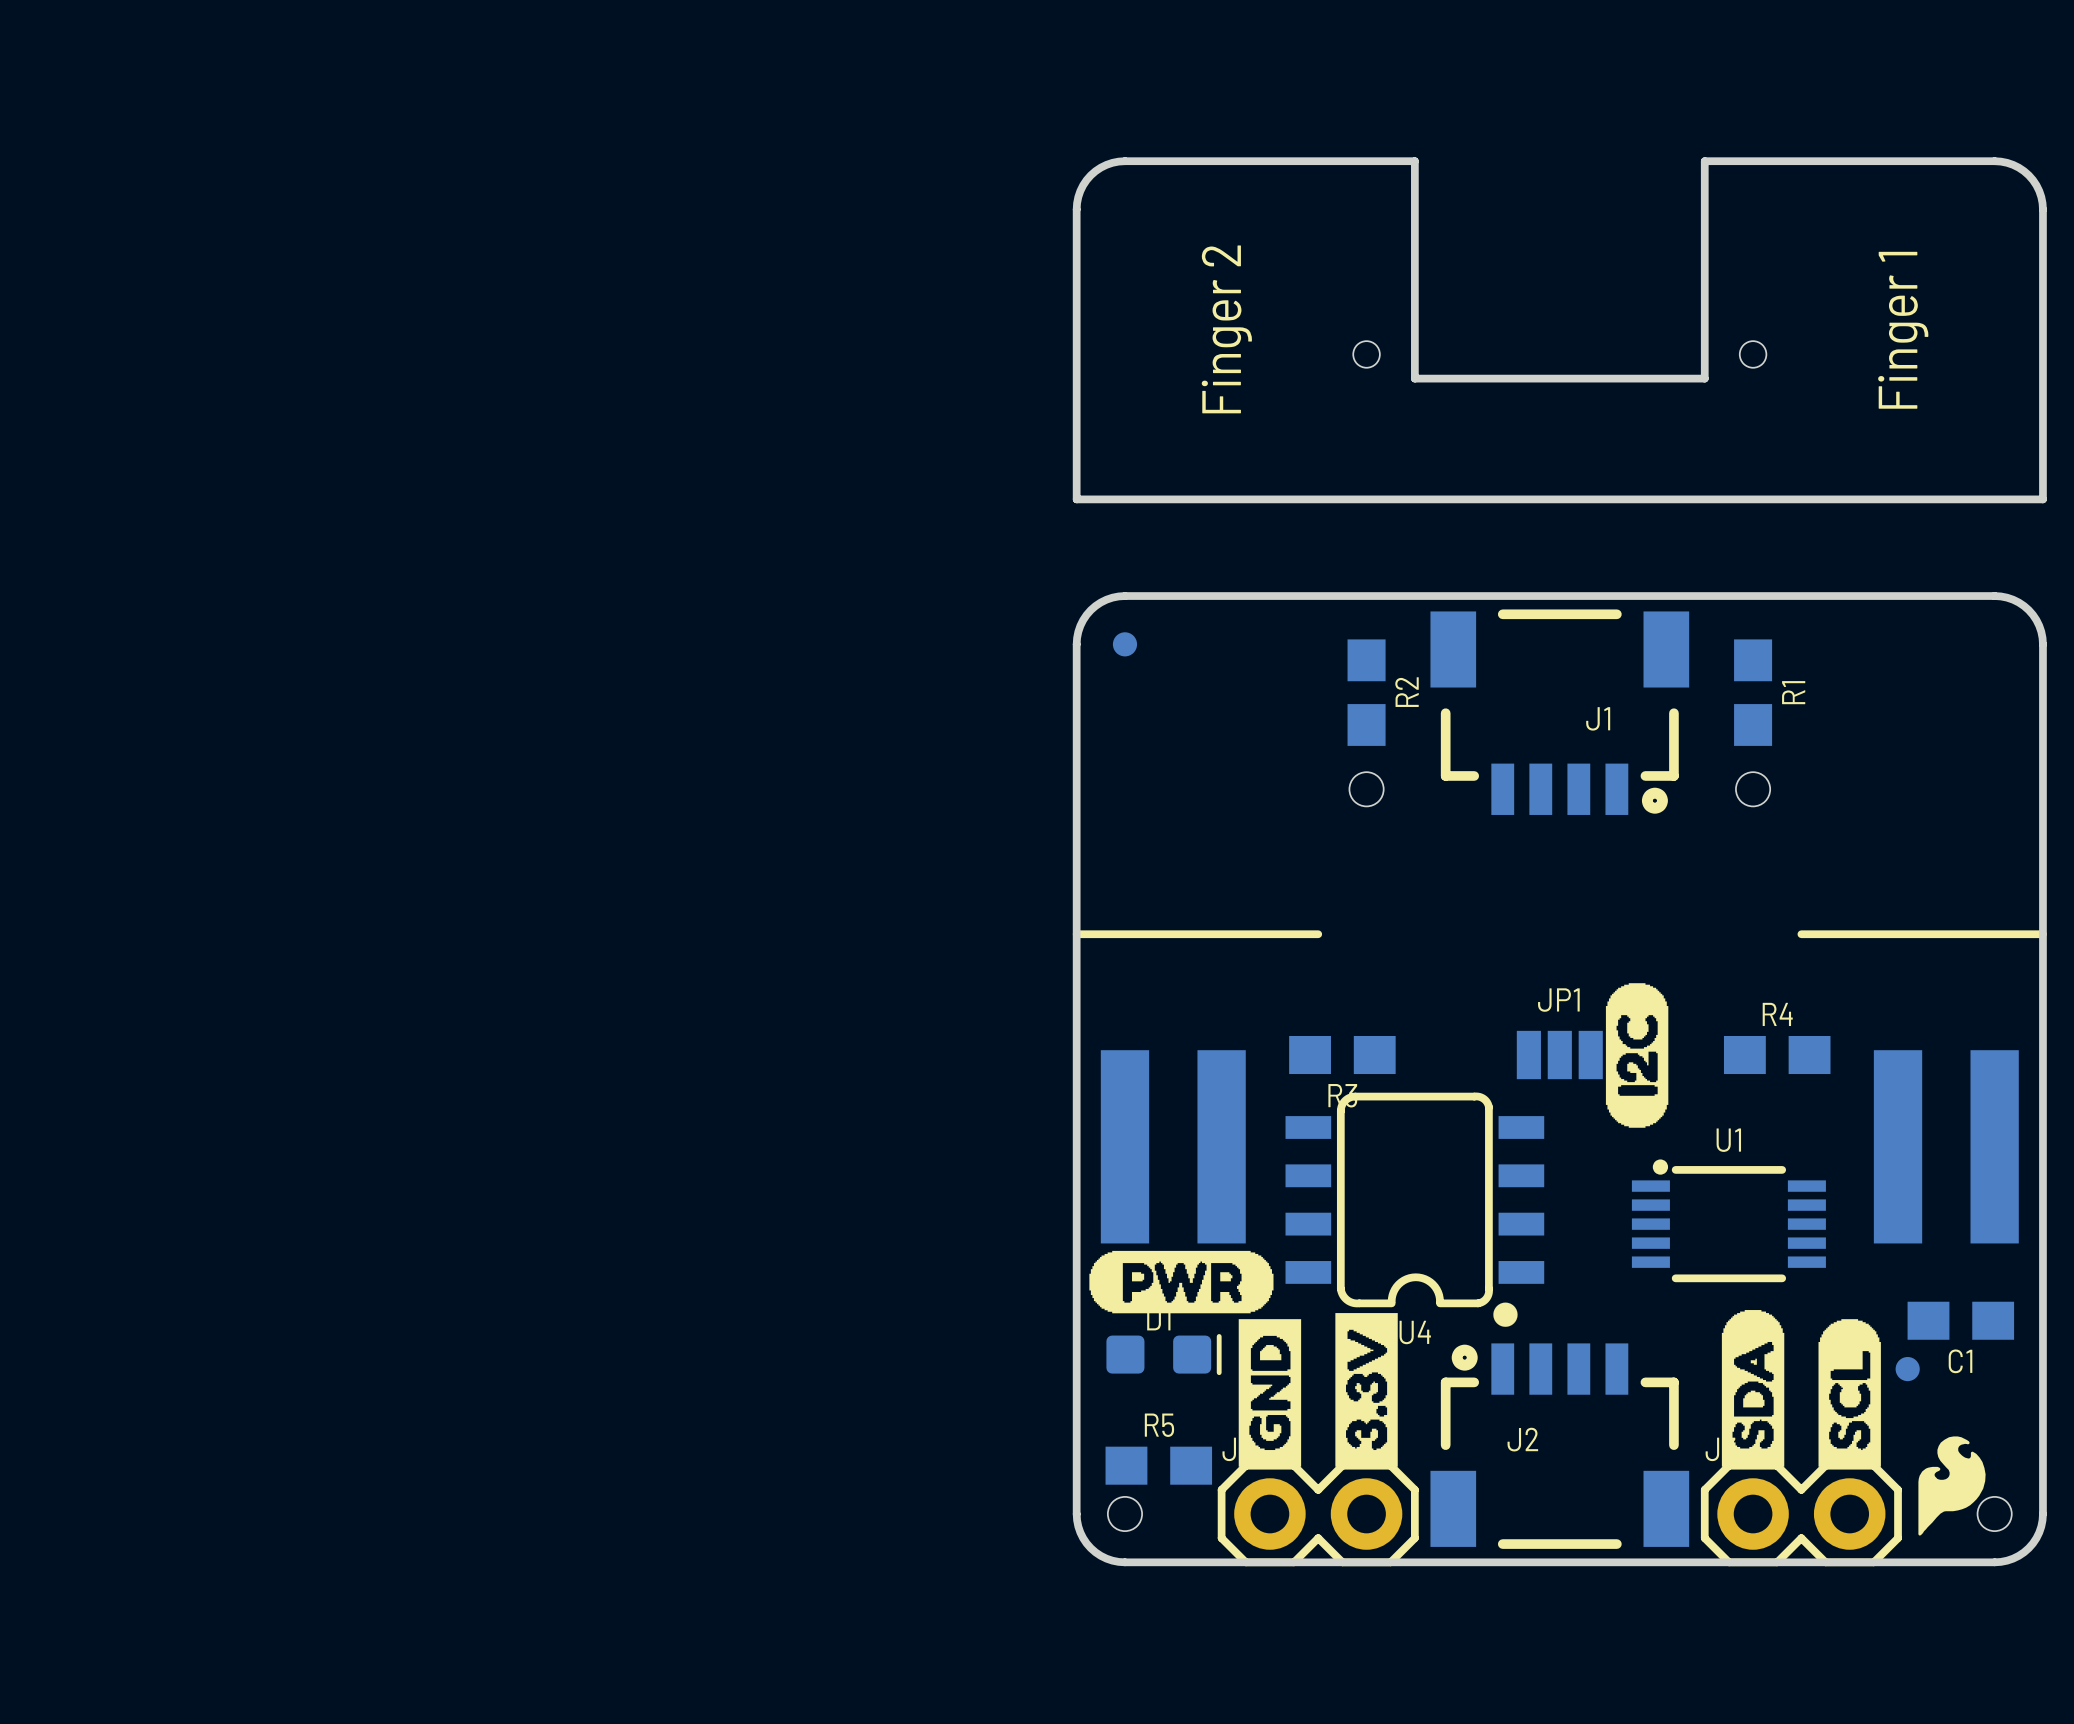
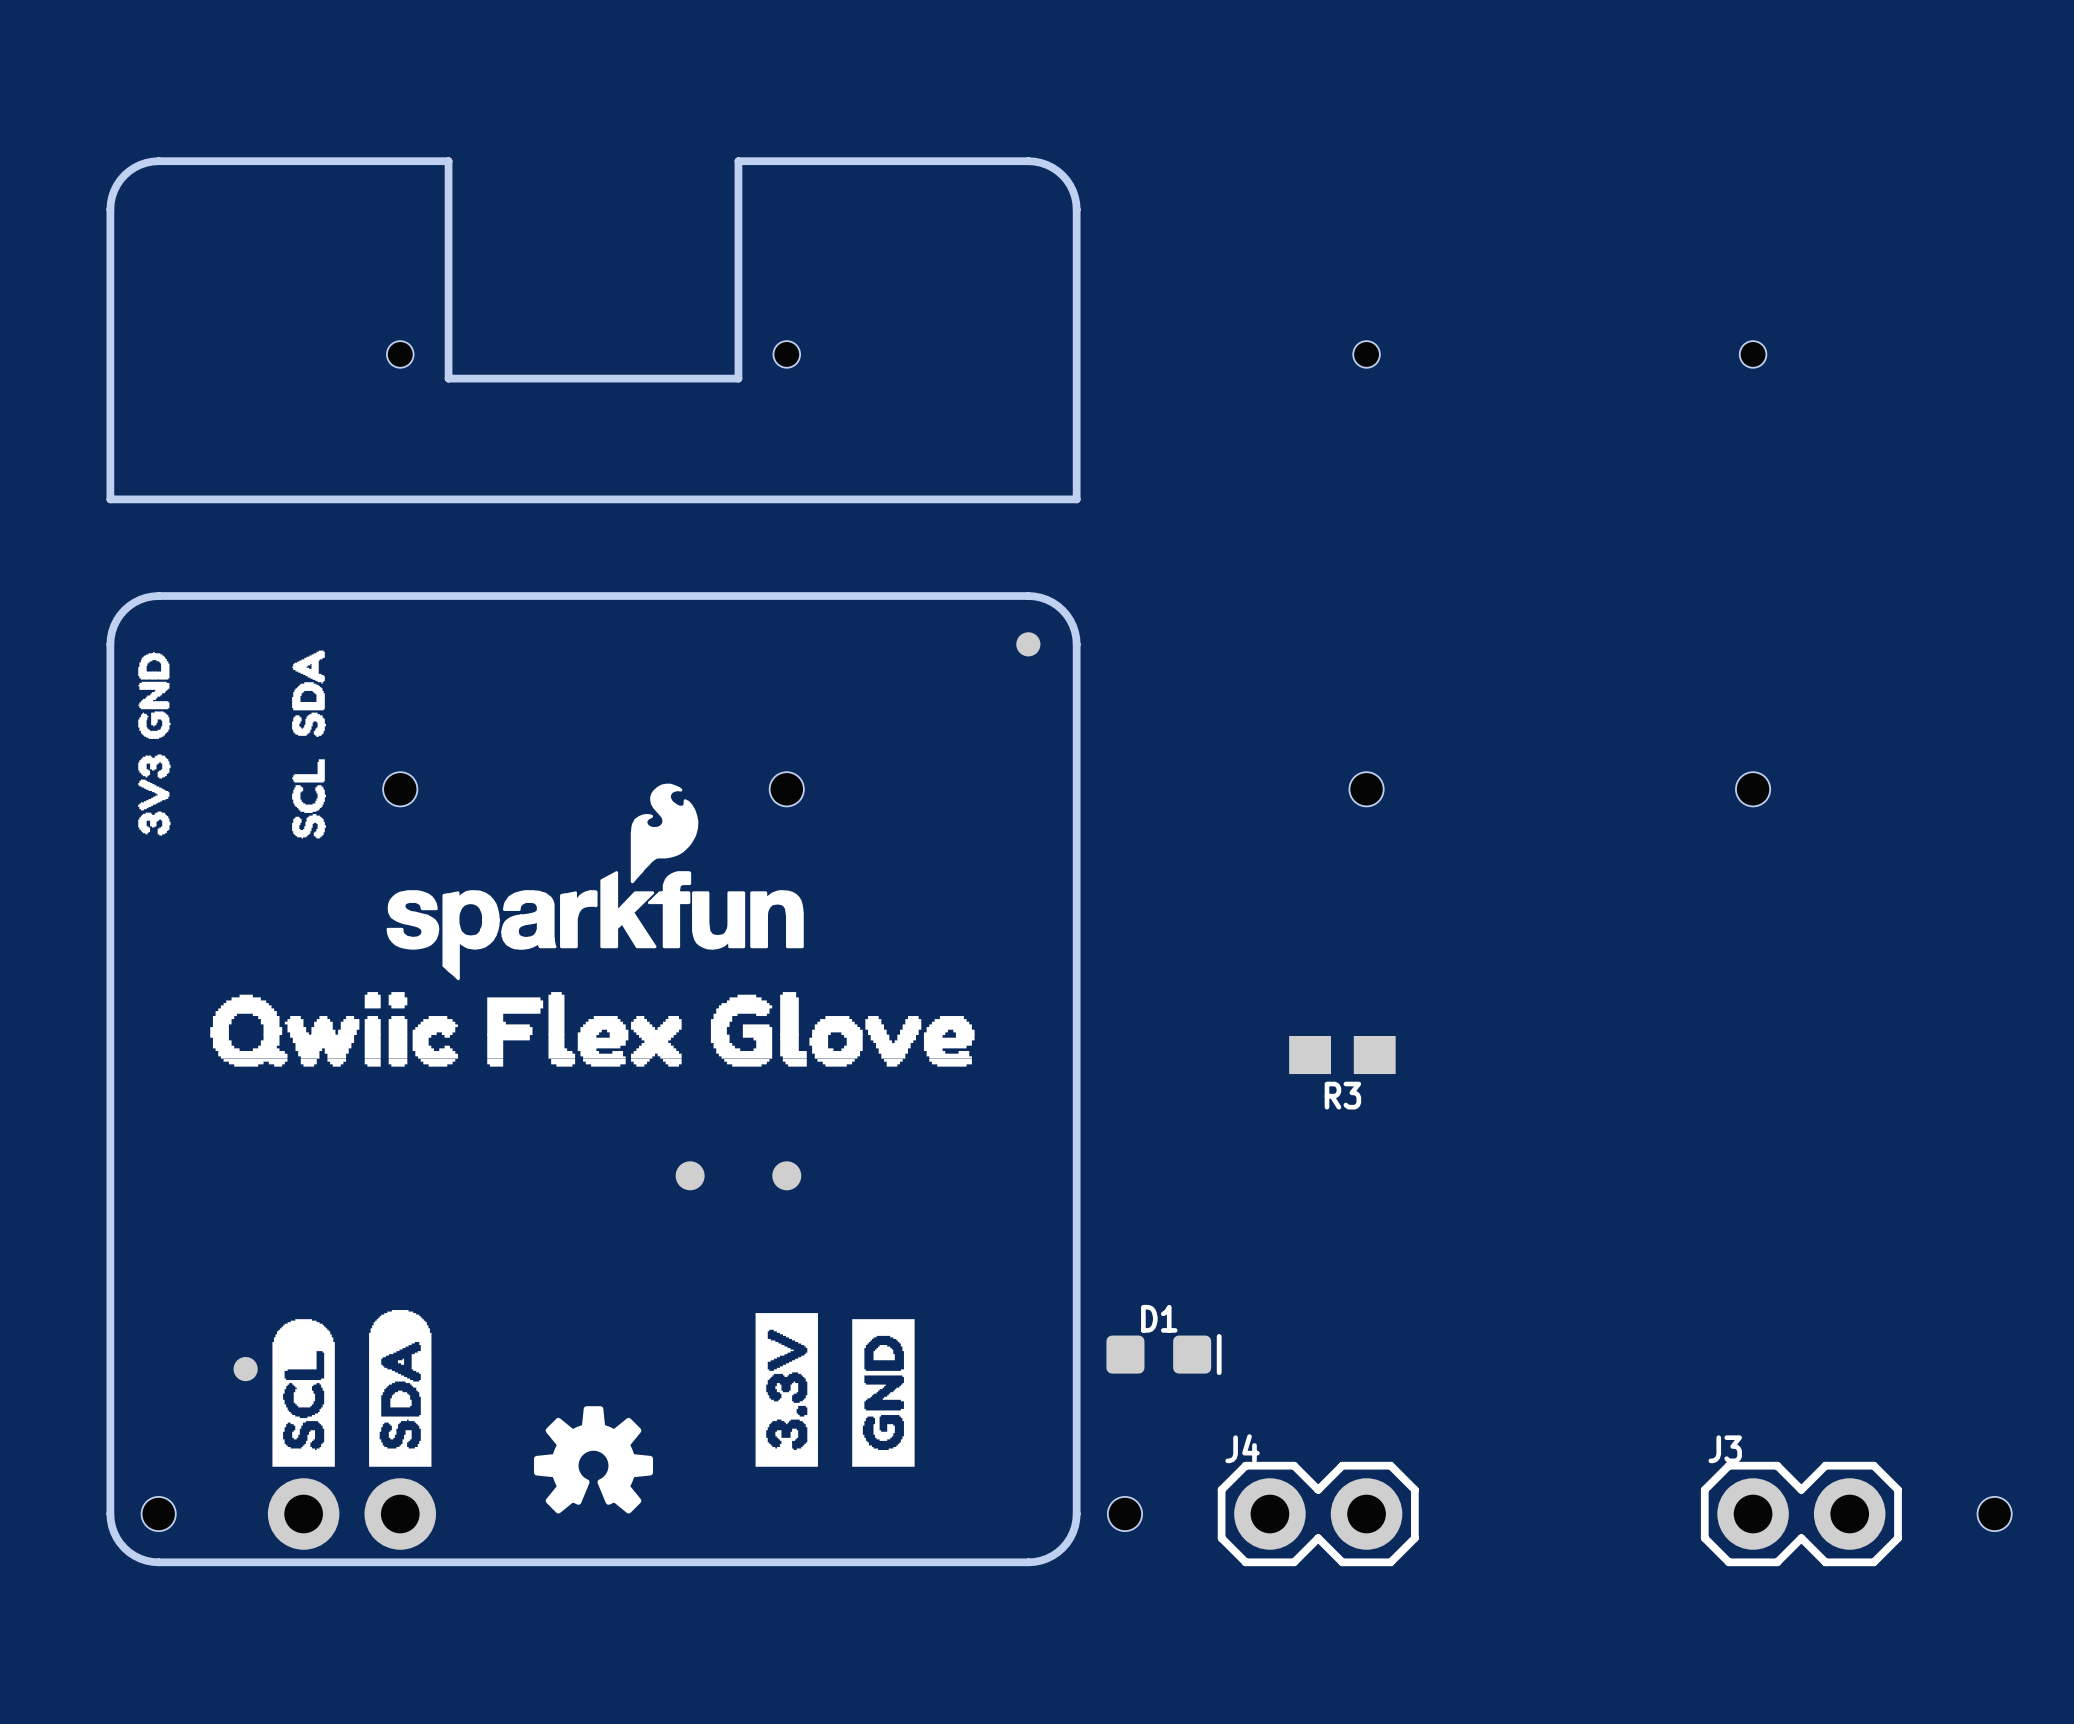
board edge: (1076, 209) (1078, 197) (1086, 180) (1100, 167) (1118, 161) (1414, 161) (1414, 378) (1704, 378) (1704, 161) (2000, 161) (2018, 167) (2032, 180) (2041, 197) (2042, 209) (2042, 499) (1076, 499) -> (1076, 209) (1075, 197) (1066, 180) (1052, 167) (1034, 161) (738, 161) (738, 378) (448, 378) (448, 161) (152, 161) (134, 167) (120, 180) (112, 197) (110, 209) (110, 499) (1076, 499)
text: Finger 2 (1226, 329) -> none
text: Finger 1 (1903, 330) -> none
hole: none -> (400, 354)
hole: none -> (786, 354)
board edge: (1076, 644) (1080, 625) (1090, 610) (1106, 599) (1124, 596) (1994, 596) (2013, 599) (2028, 610) (2039, 625) (2042, 644) (2042, 1514) (2039, 1532) (2028, 1548) (2013, 1558) (1994, 1562) (1124, 1562) (1106, 1558) (1090, 1548) (1080, 1532) (1076, 1514) -> (1076, 644) (1072, 625) (1062, 610) (1046, 599) (1028, 596) (158, 596) (140, 599) (124, 610) (114, 625) (110, 644) (110, 1514) (114, 1532) (124, 1548) (140, 1558) (158, 1562) (1028, 1562) (1046, 1558) (1062, 1548) (1072, 1532) (1076, 1514)
part position: (1124, 644) -> (1028, 644)
drawing: none -> [292, 650, 326, 839]
drawing: none -> [138, 652, 171, 836]
R2: (1366, 692) -> none
R1: (1753, 692) -> none
J1: (1559, 712) -> none
drawing: none -> [210, 783, 975, 1067]
hole: none -> (400, 789)
hole: none -> (786, 789)
line: (1318, 934) (1076, 934) -> none
line: (2042, 934) (1801, 934) -> none
drawing: [1605, 983, 1669, 1128] -> none
JP1: (1559, 1055) -> none
R4: (1777, 1055) -> none
part: (1173, 1146) -> none
part: (1946, 1146) -> none
part: none -> (690, 1175)
part: none -> (786, 1175)
U4: (1414, 1209) -> none
U1: (1728, 1220) -> none
drawing: [1089, 1250, 1274, 1314] -> none
drawing: none -> [272, 1310, 432, 1467]
drawing: [1721, 1310, 1986, 1536] -> none
C1: (1960, 1320) -> none
part: none -> (245, 1369)
part: (1907, 1369) -> none
drawing position: (1366, 1389) -> (786, 1389)
drawing position: (1269, 1392) -> (883, 1392)
drawing: none -> [534, 1406, 654, 1514]
J2: (1559, 1446) -> none
R5: (1158, 1465) -> none
hole: none -> (158, 1514)
part: none -> (351, 1514)

